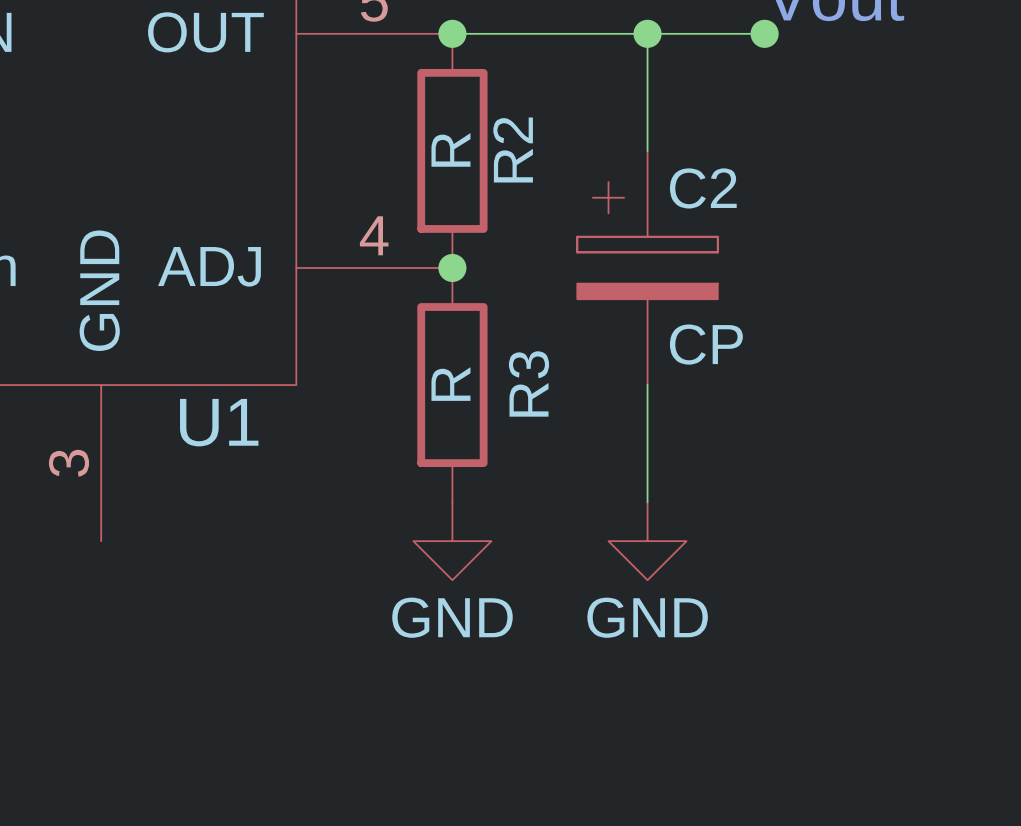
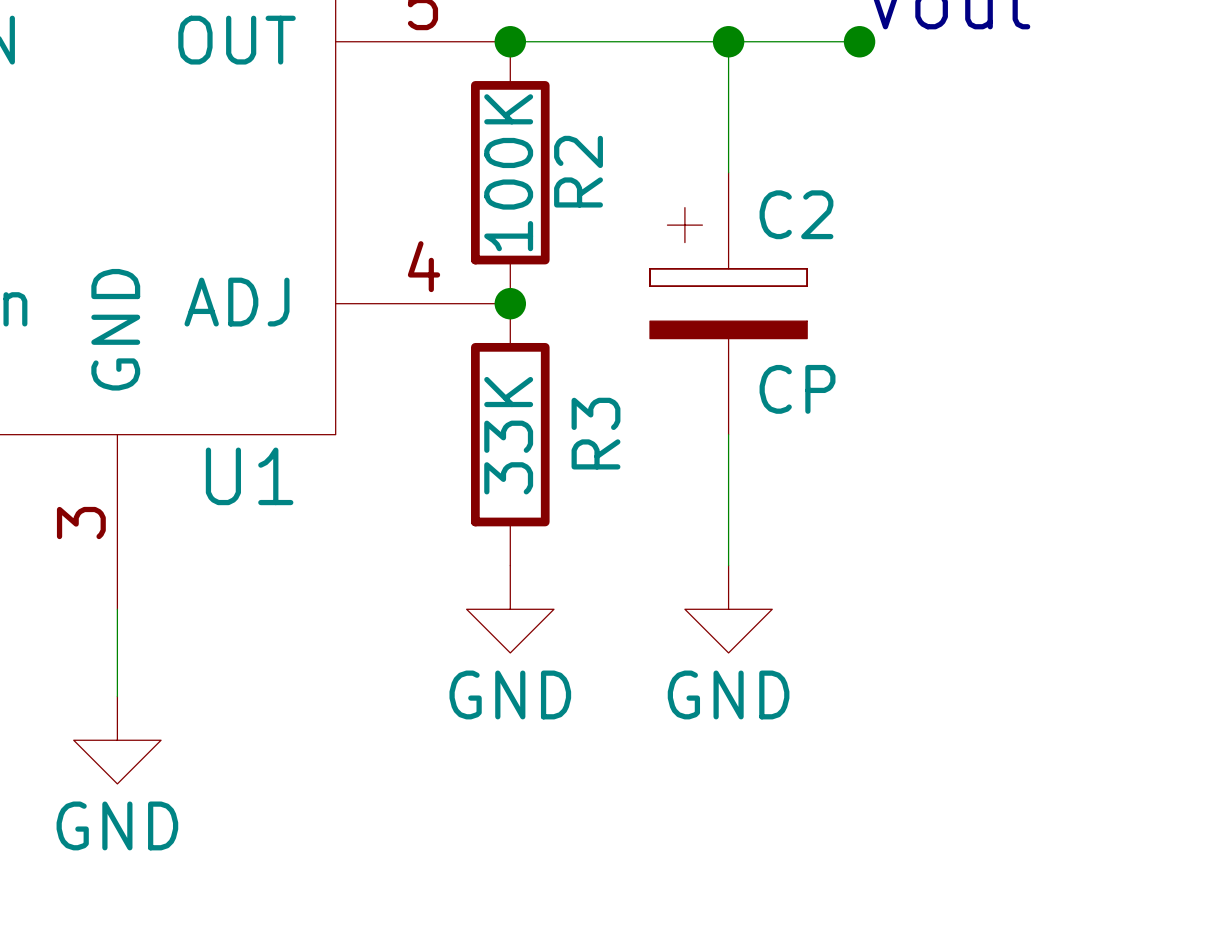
R2 value: R (450, 149) -> 100K (508, 172)
R3 value: R (450, 384) -> 33K (508, 435)
wire: none -> (117, 609) (117, 696)
power symbol: none -> GND (117, 740)

